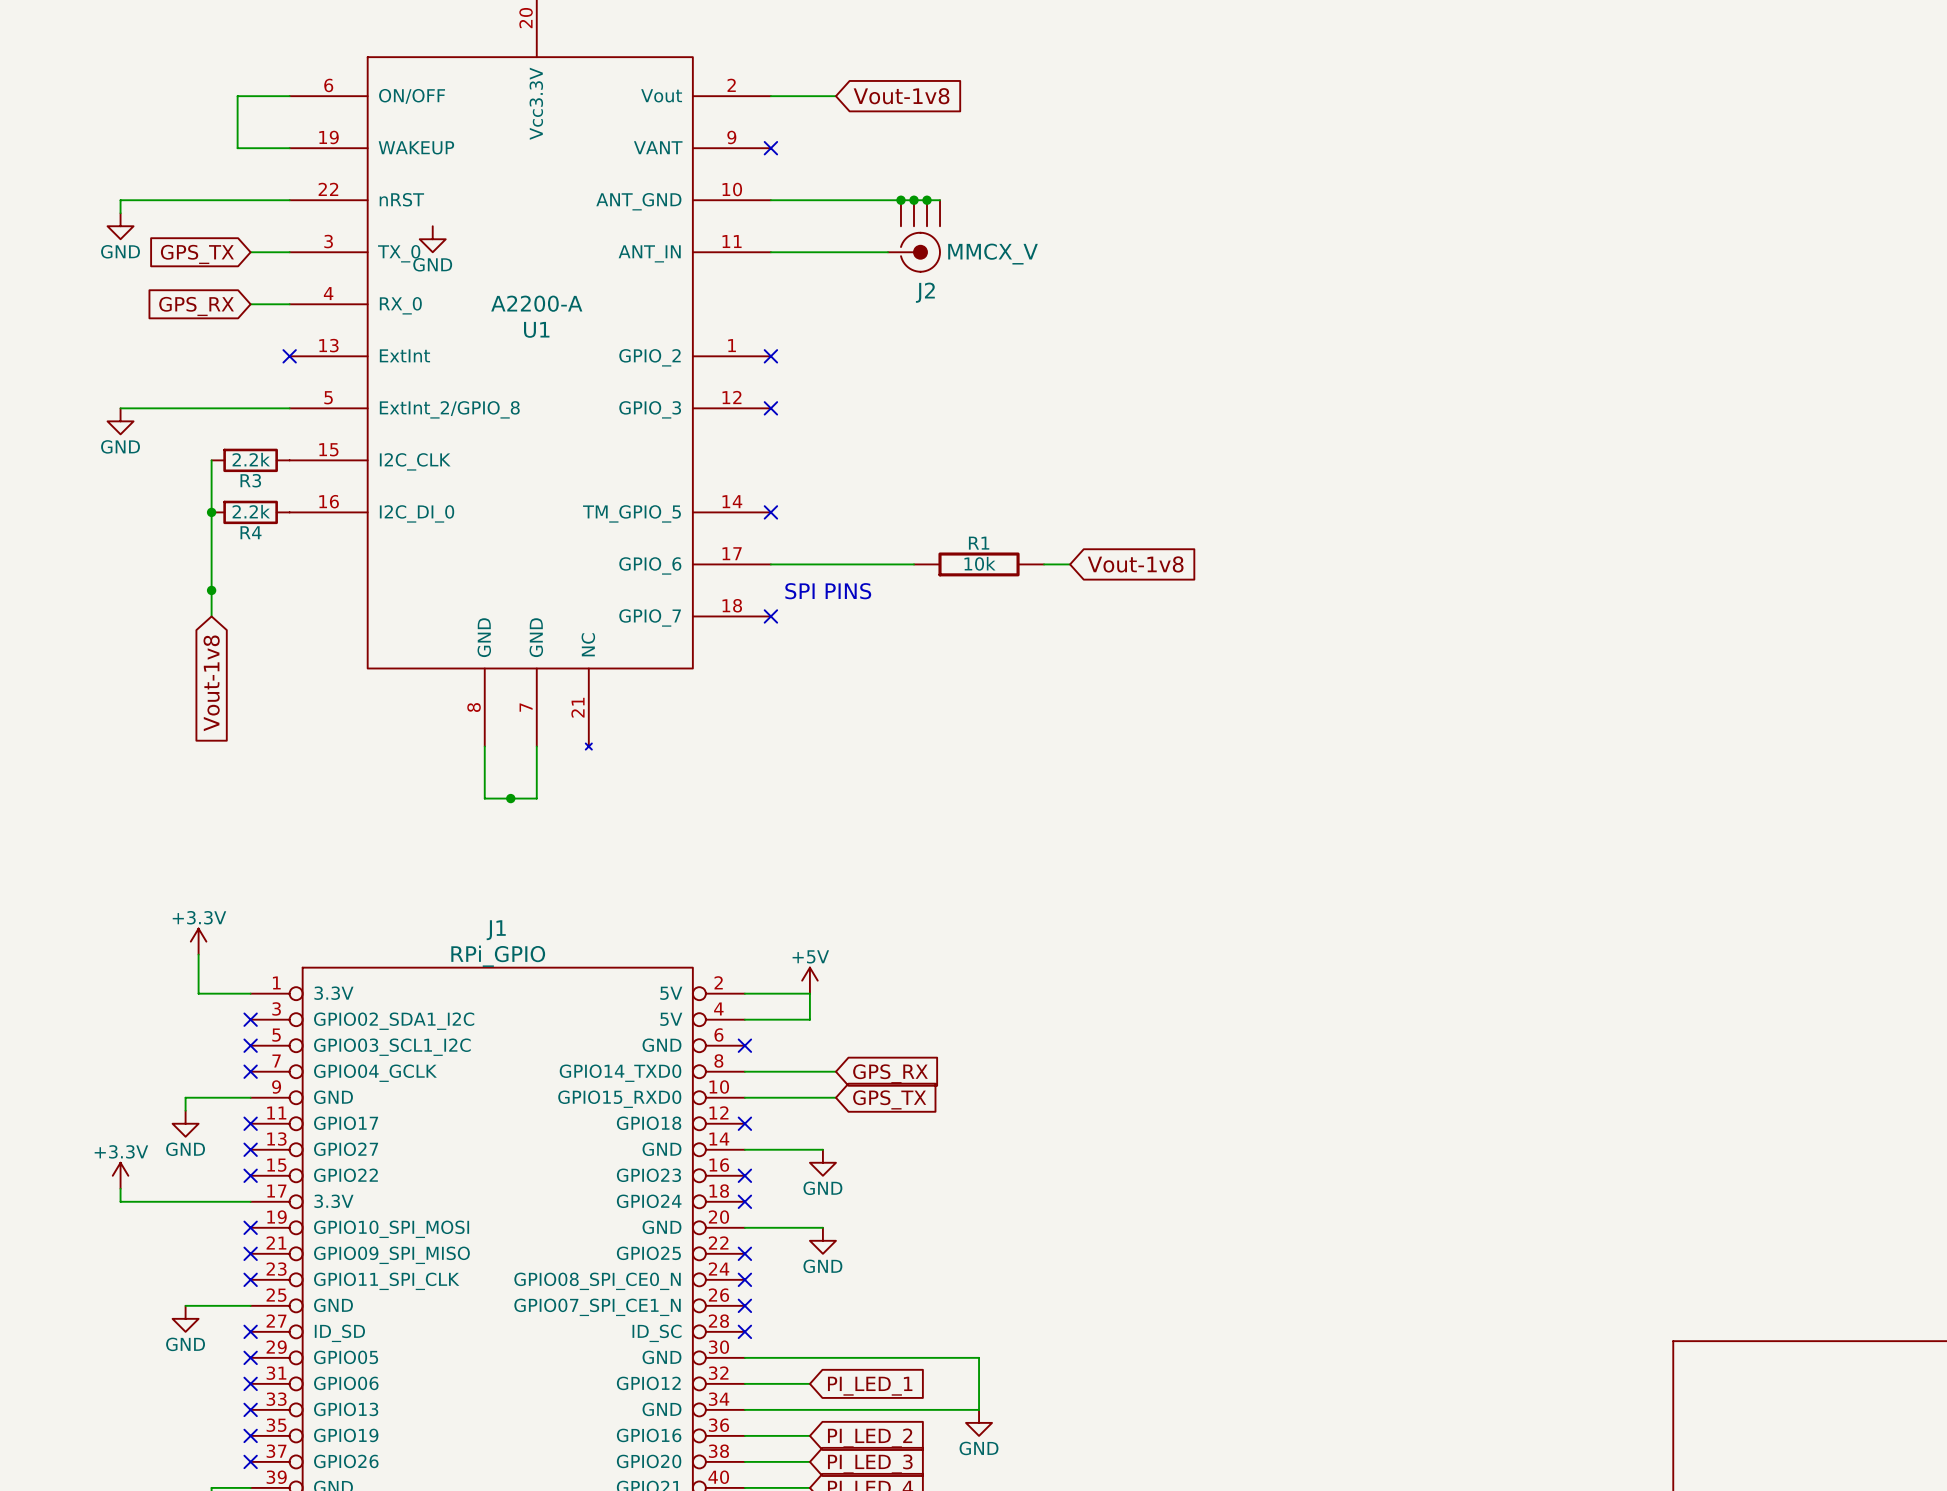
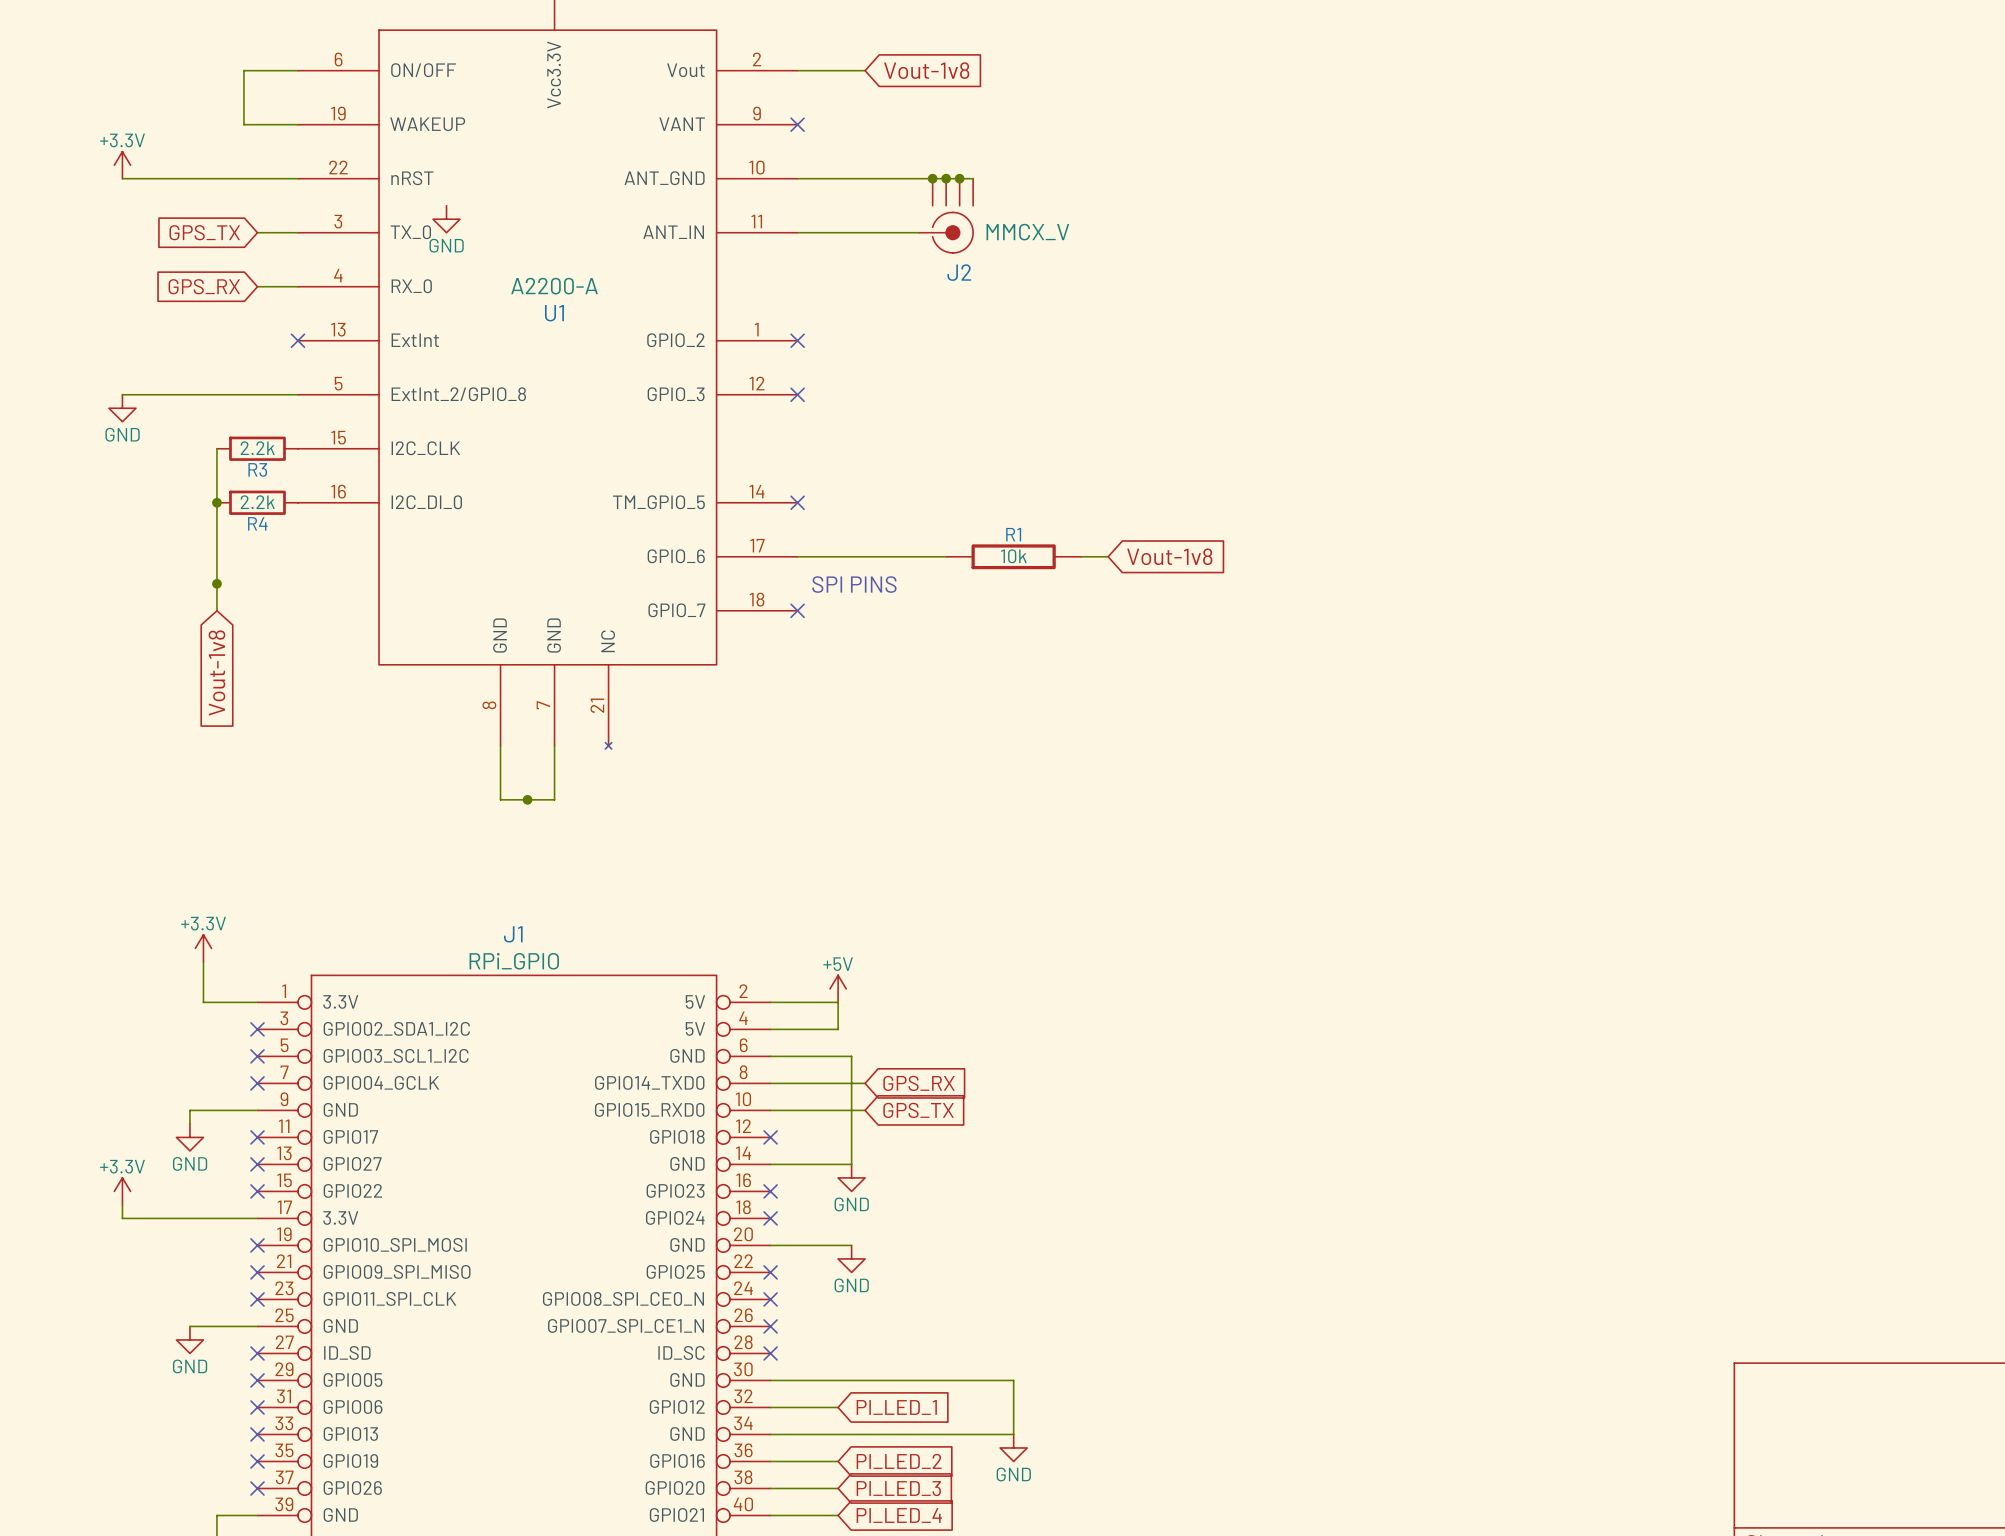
power symbol: none -> +3.3V (122, 165)
wire: (120, 200) (120, 213) -> none
power symbol: GND (120, 226) -> none
wire: none -> (770, 1056) (851, 1056) (851, 1164)
no-connect mark: (744, 1045) -> none

